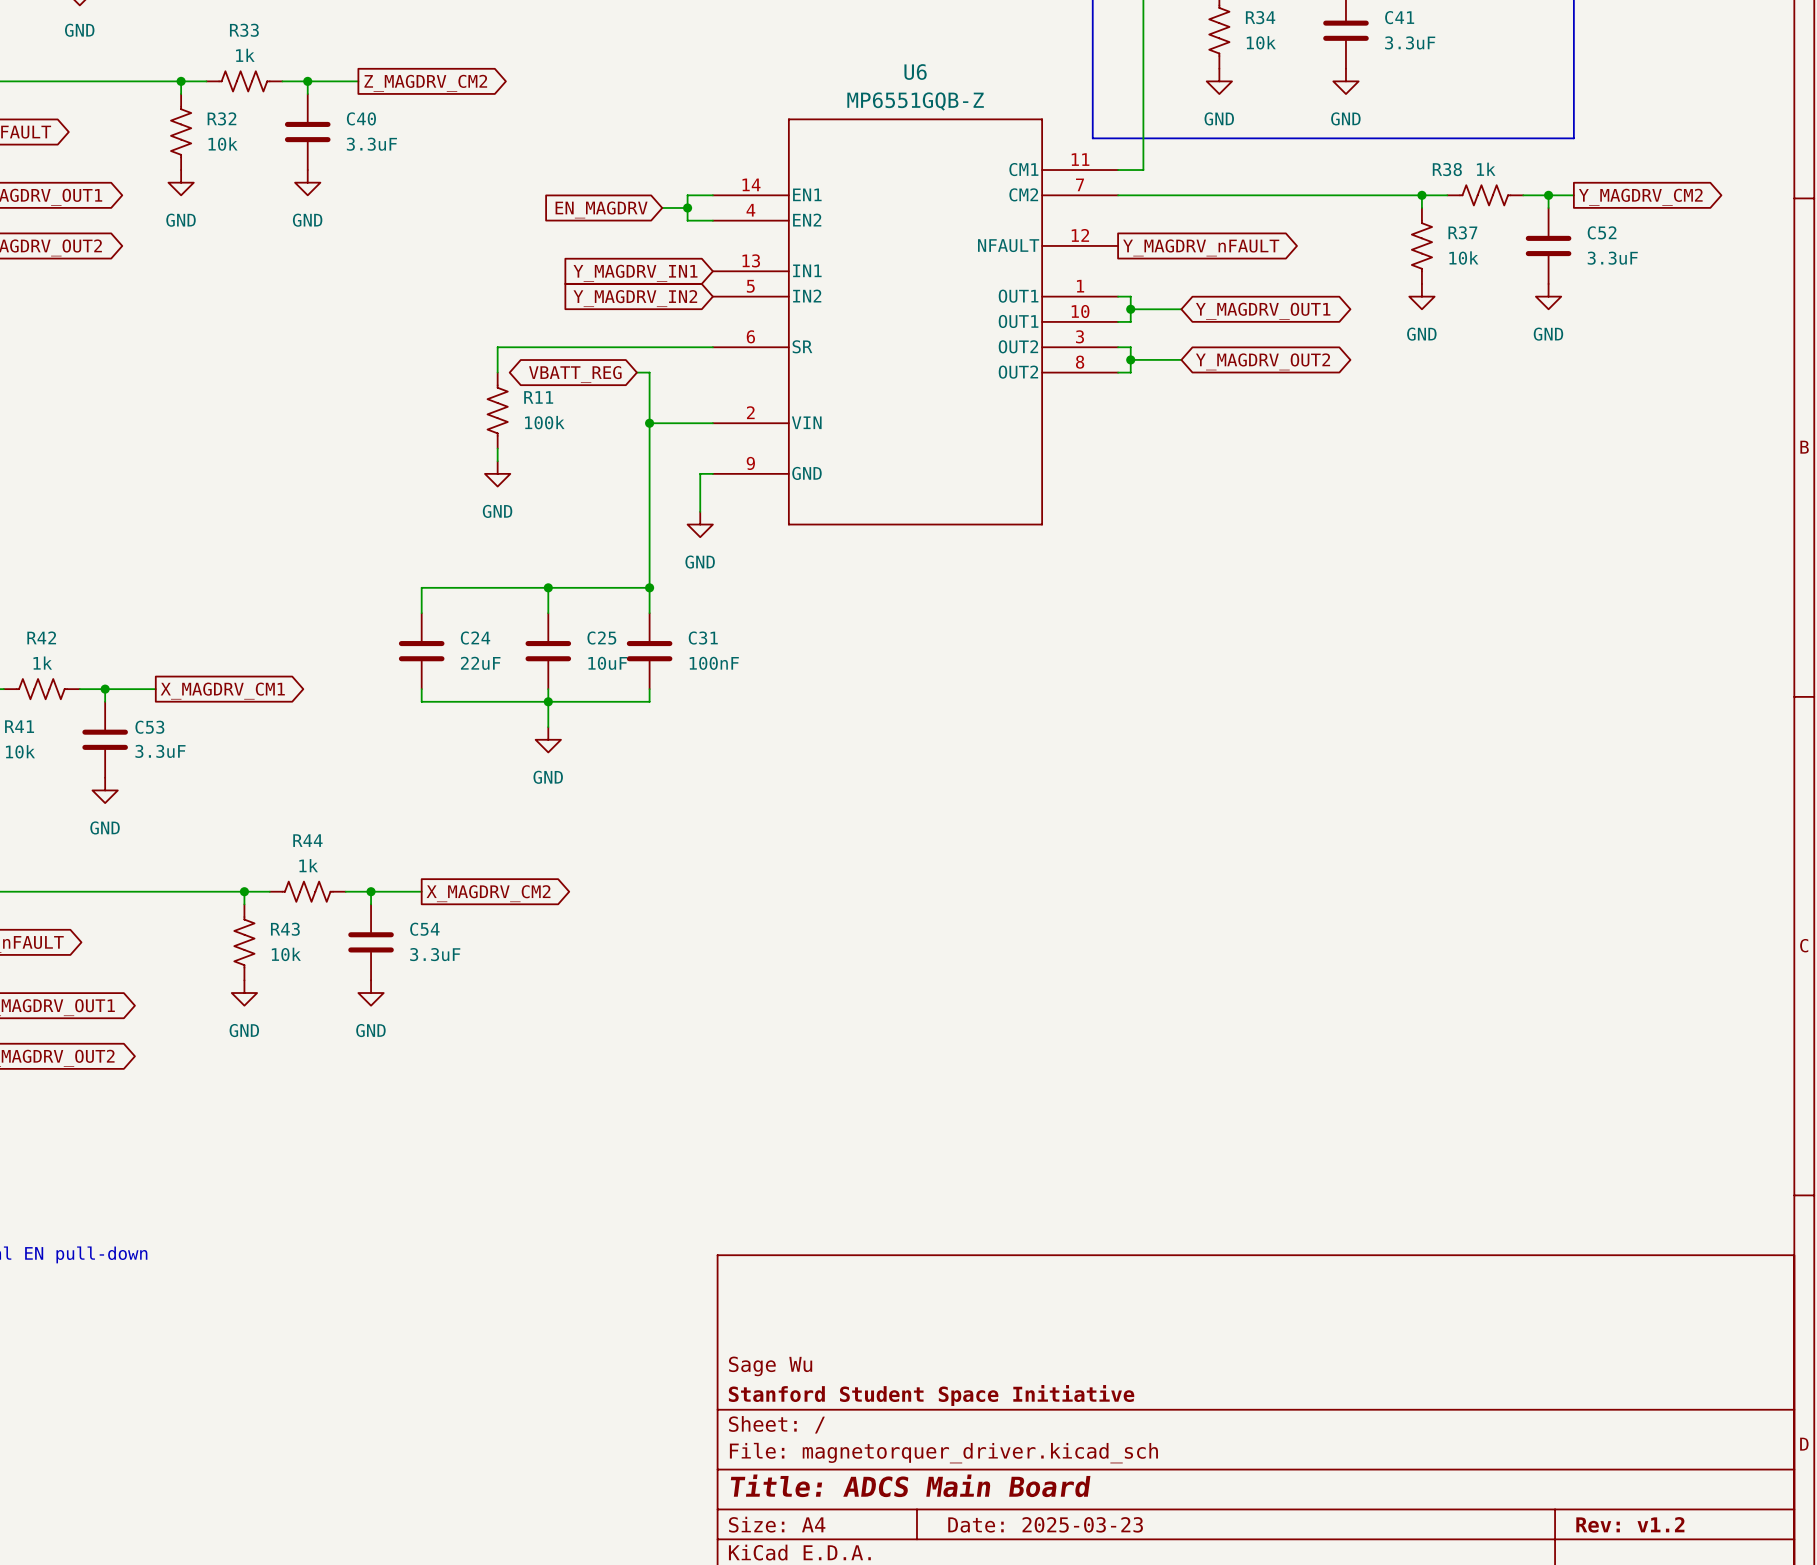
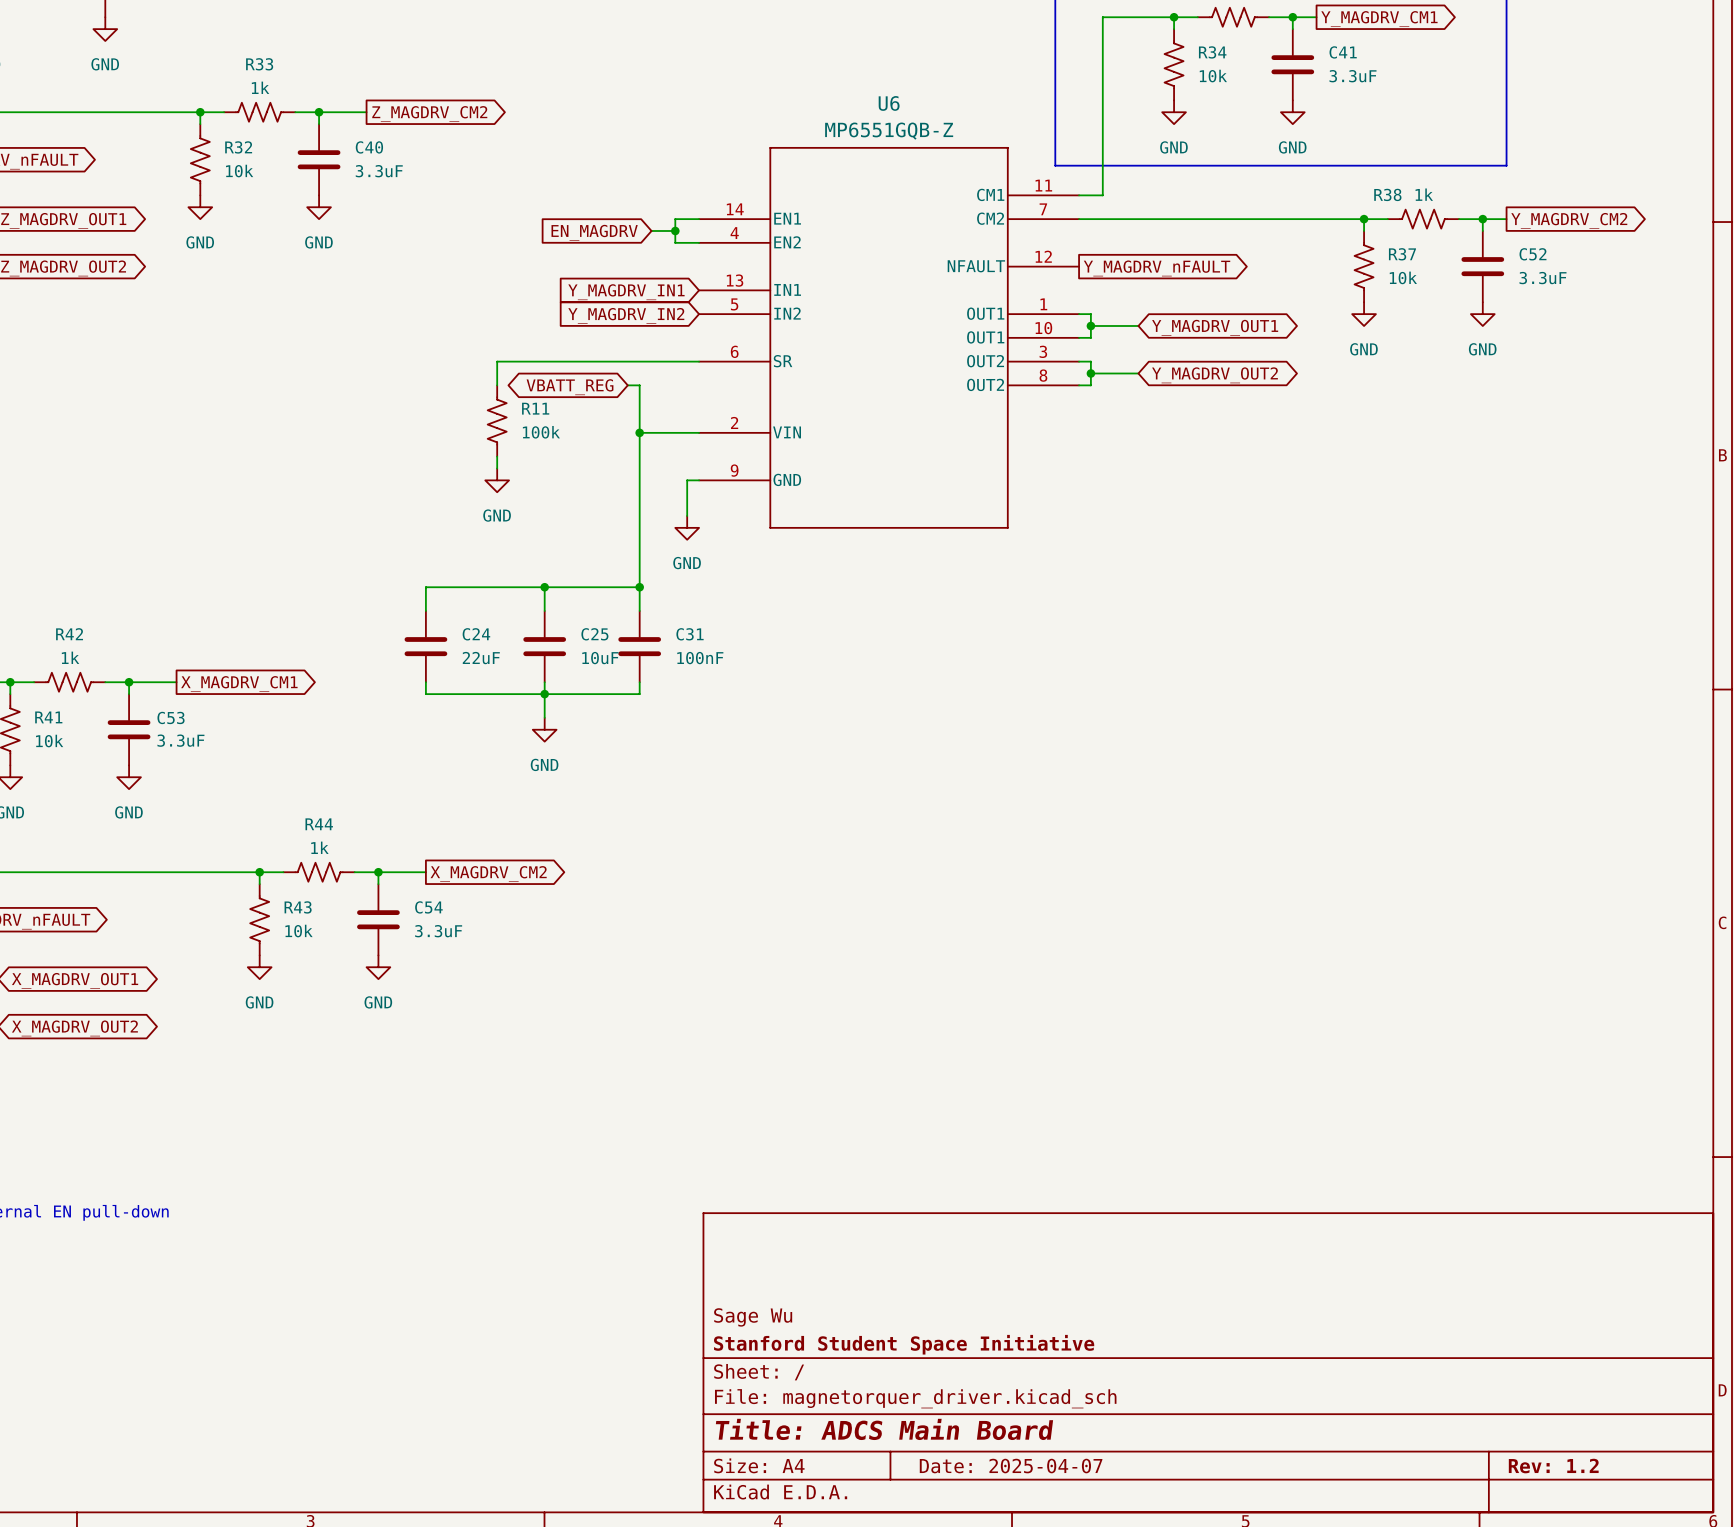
title block: Date: 2025-03-23 (1045, 1524) -> Date: 2025-04-07 (1011, 1466)
title block: Rev: v1.2 (1630, 1524) -> Rev: 1.2 (1553, 1466)

